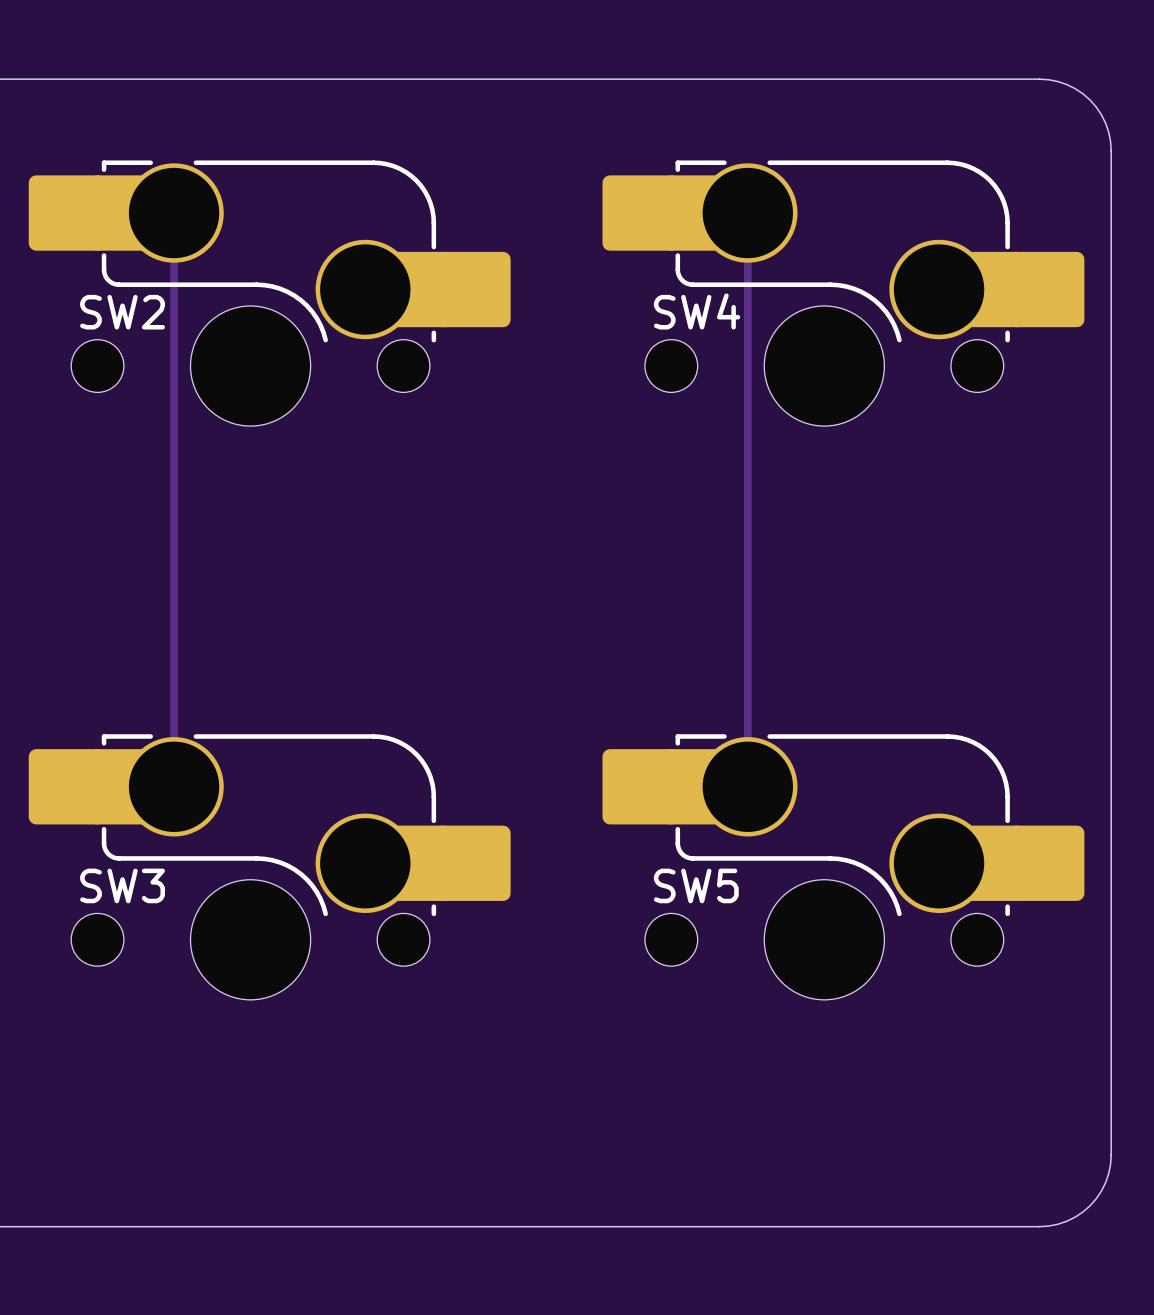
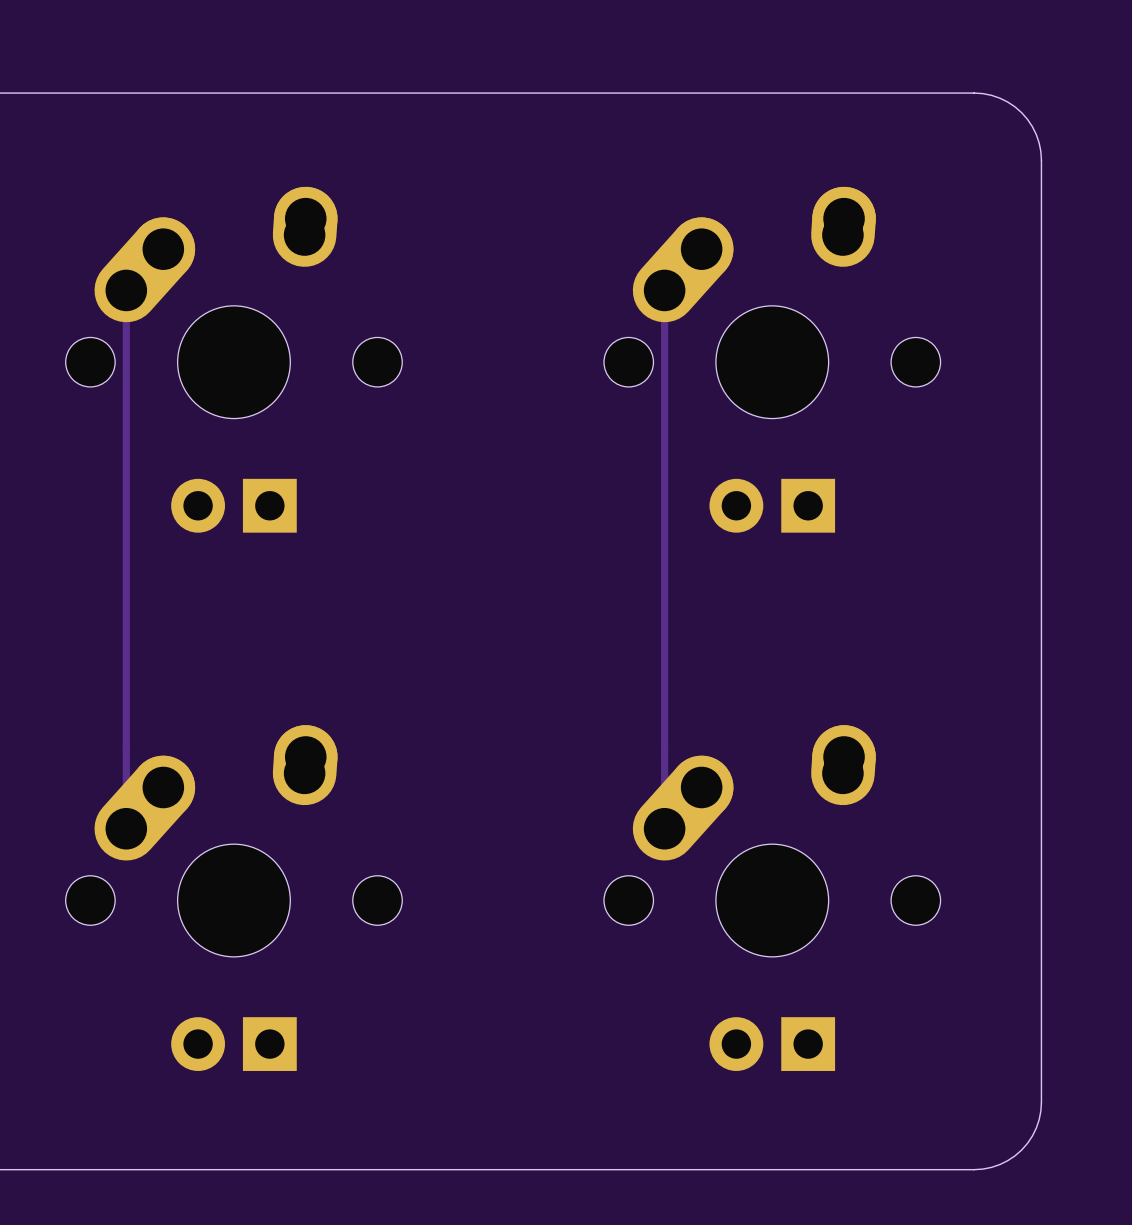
track: (174, 213) (174, 786) -> (126, 290) (126, 828)
track: (747, 213) (747, 786) -> (664, 290) (664, 828)
SW2: (269, 293) -> none
SW4: (843, 293) -> none
part: none -> (233, 359)
part: none -> (772, 359)
SW3: (269, 867) -> none
SW5: (843, 867) -> none
part: none -> (233, 898)
part: none -> (772, 898)

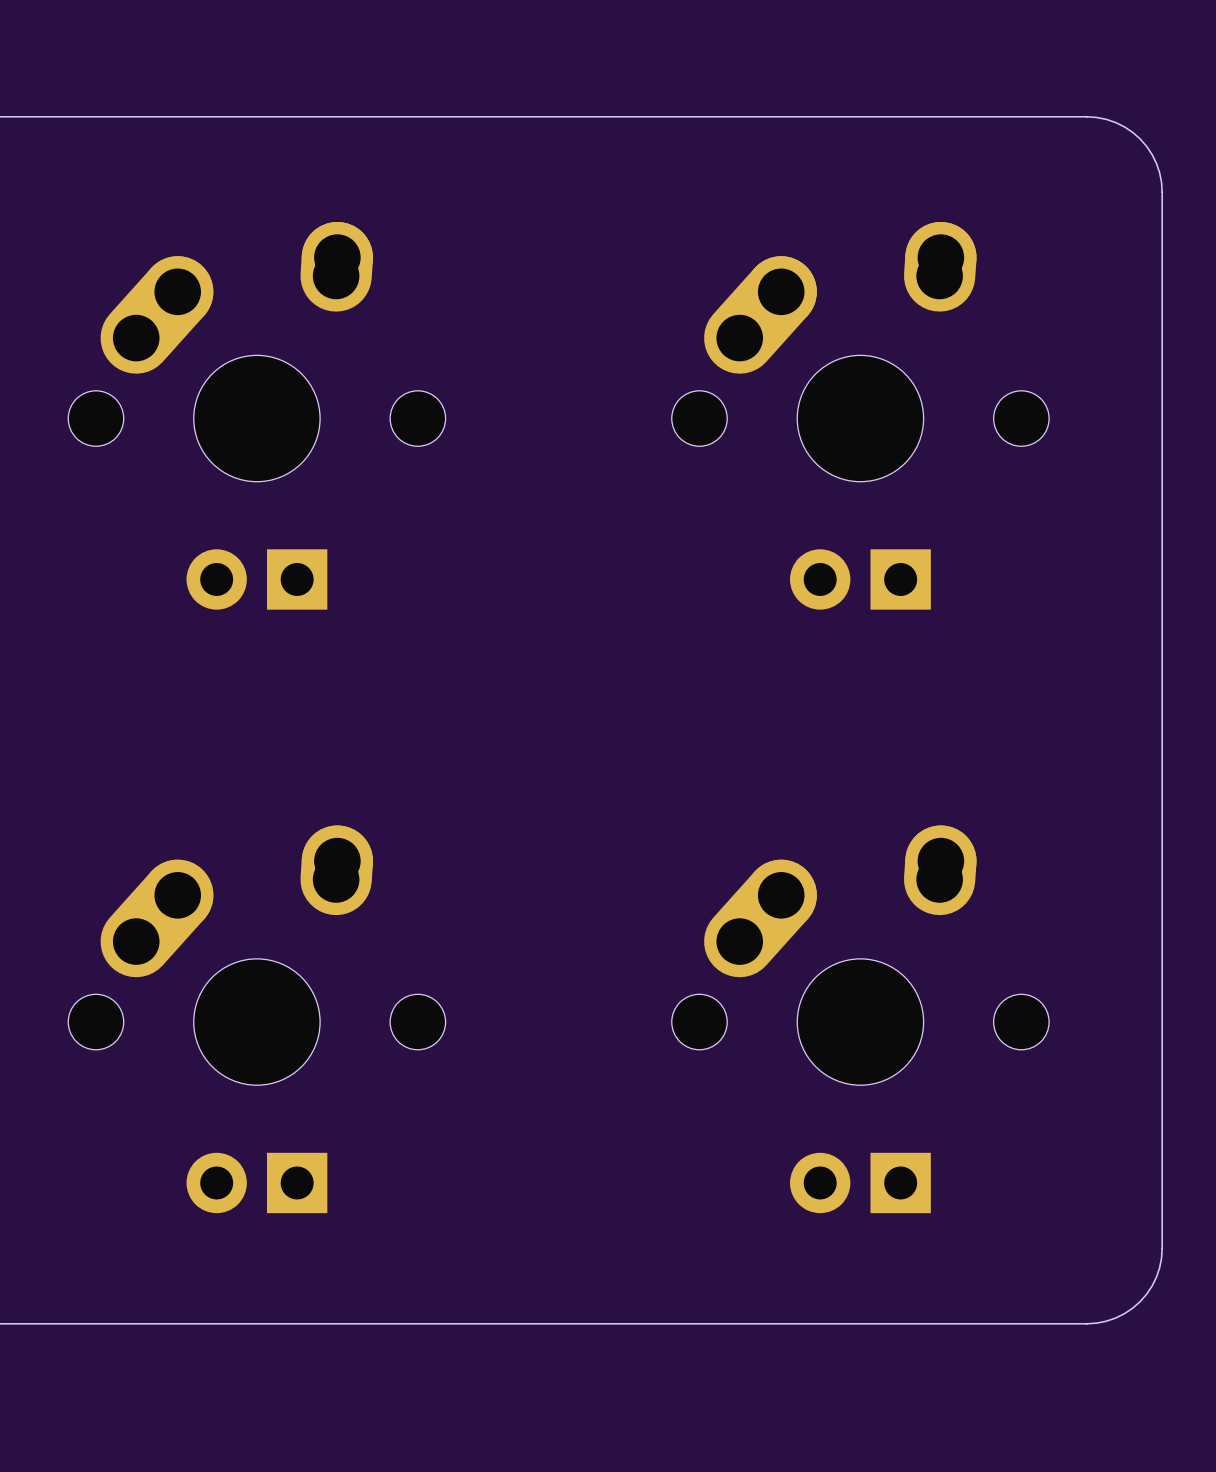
track: (126, 290) (126, 828) -> none
track: (664, 290) (664, 828) -> none

